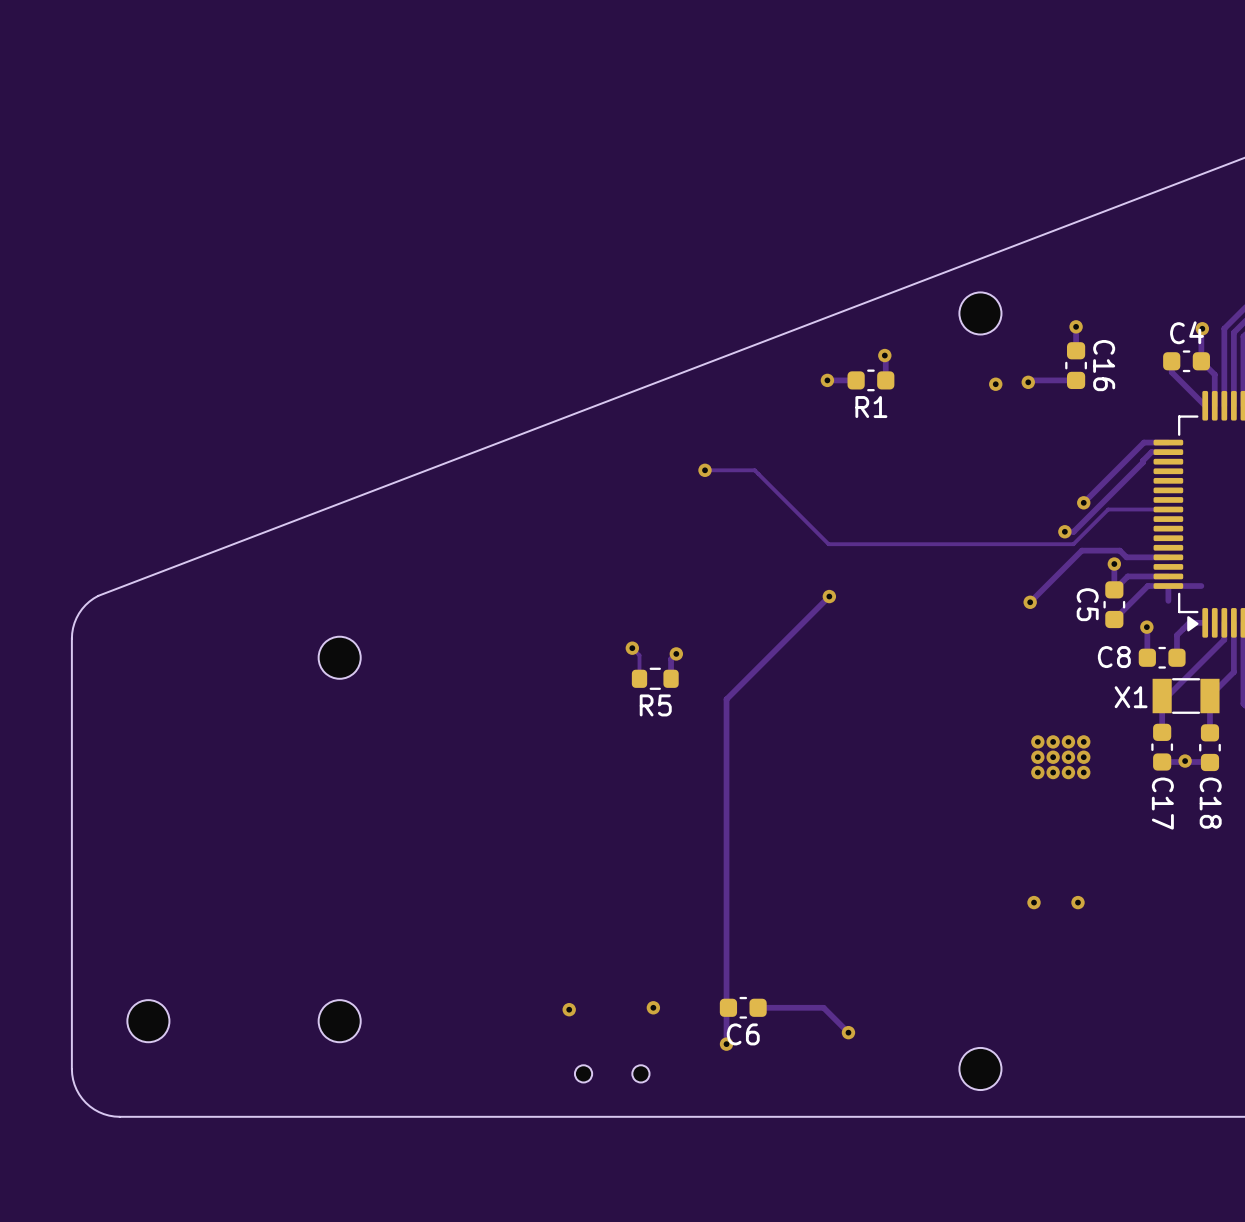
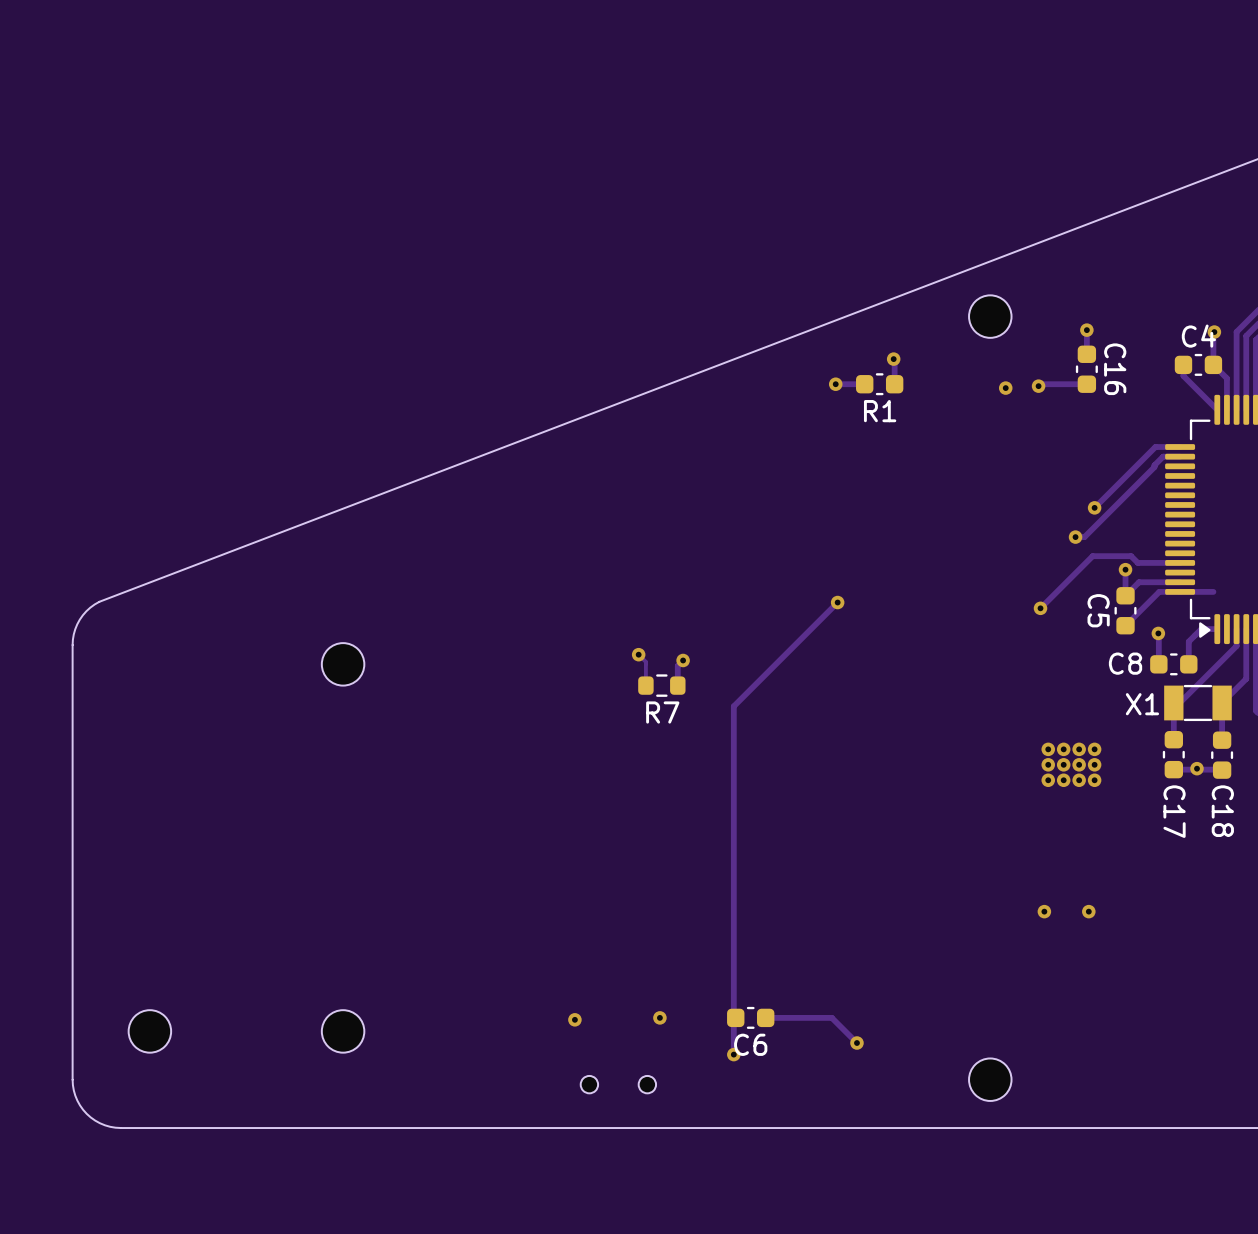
track: (703, 470) (754, 470) (828, 544) (1073, 544) (1108, 509) (1168, 509) -> none
via: (705, 470) -> none
track: (1168, 586) (1168, 600) -> none
R5 name: R5 (655, 705) -> R7 (662, 712)

